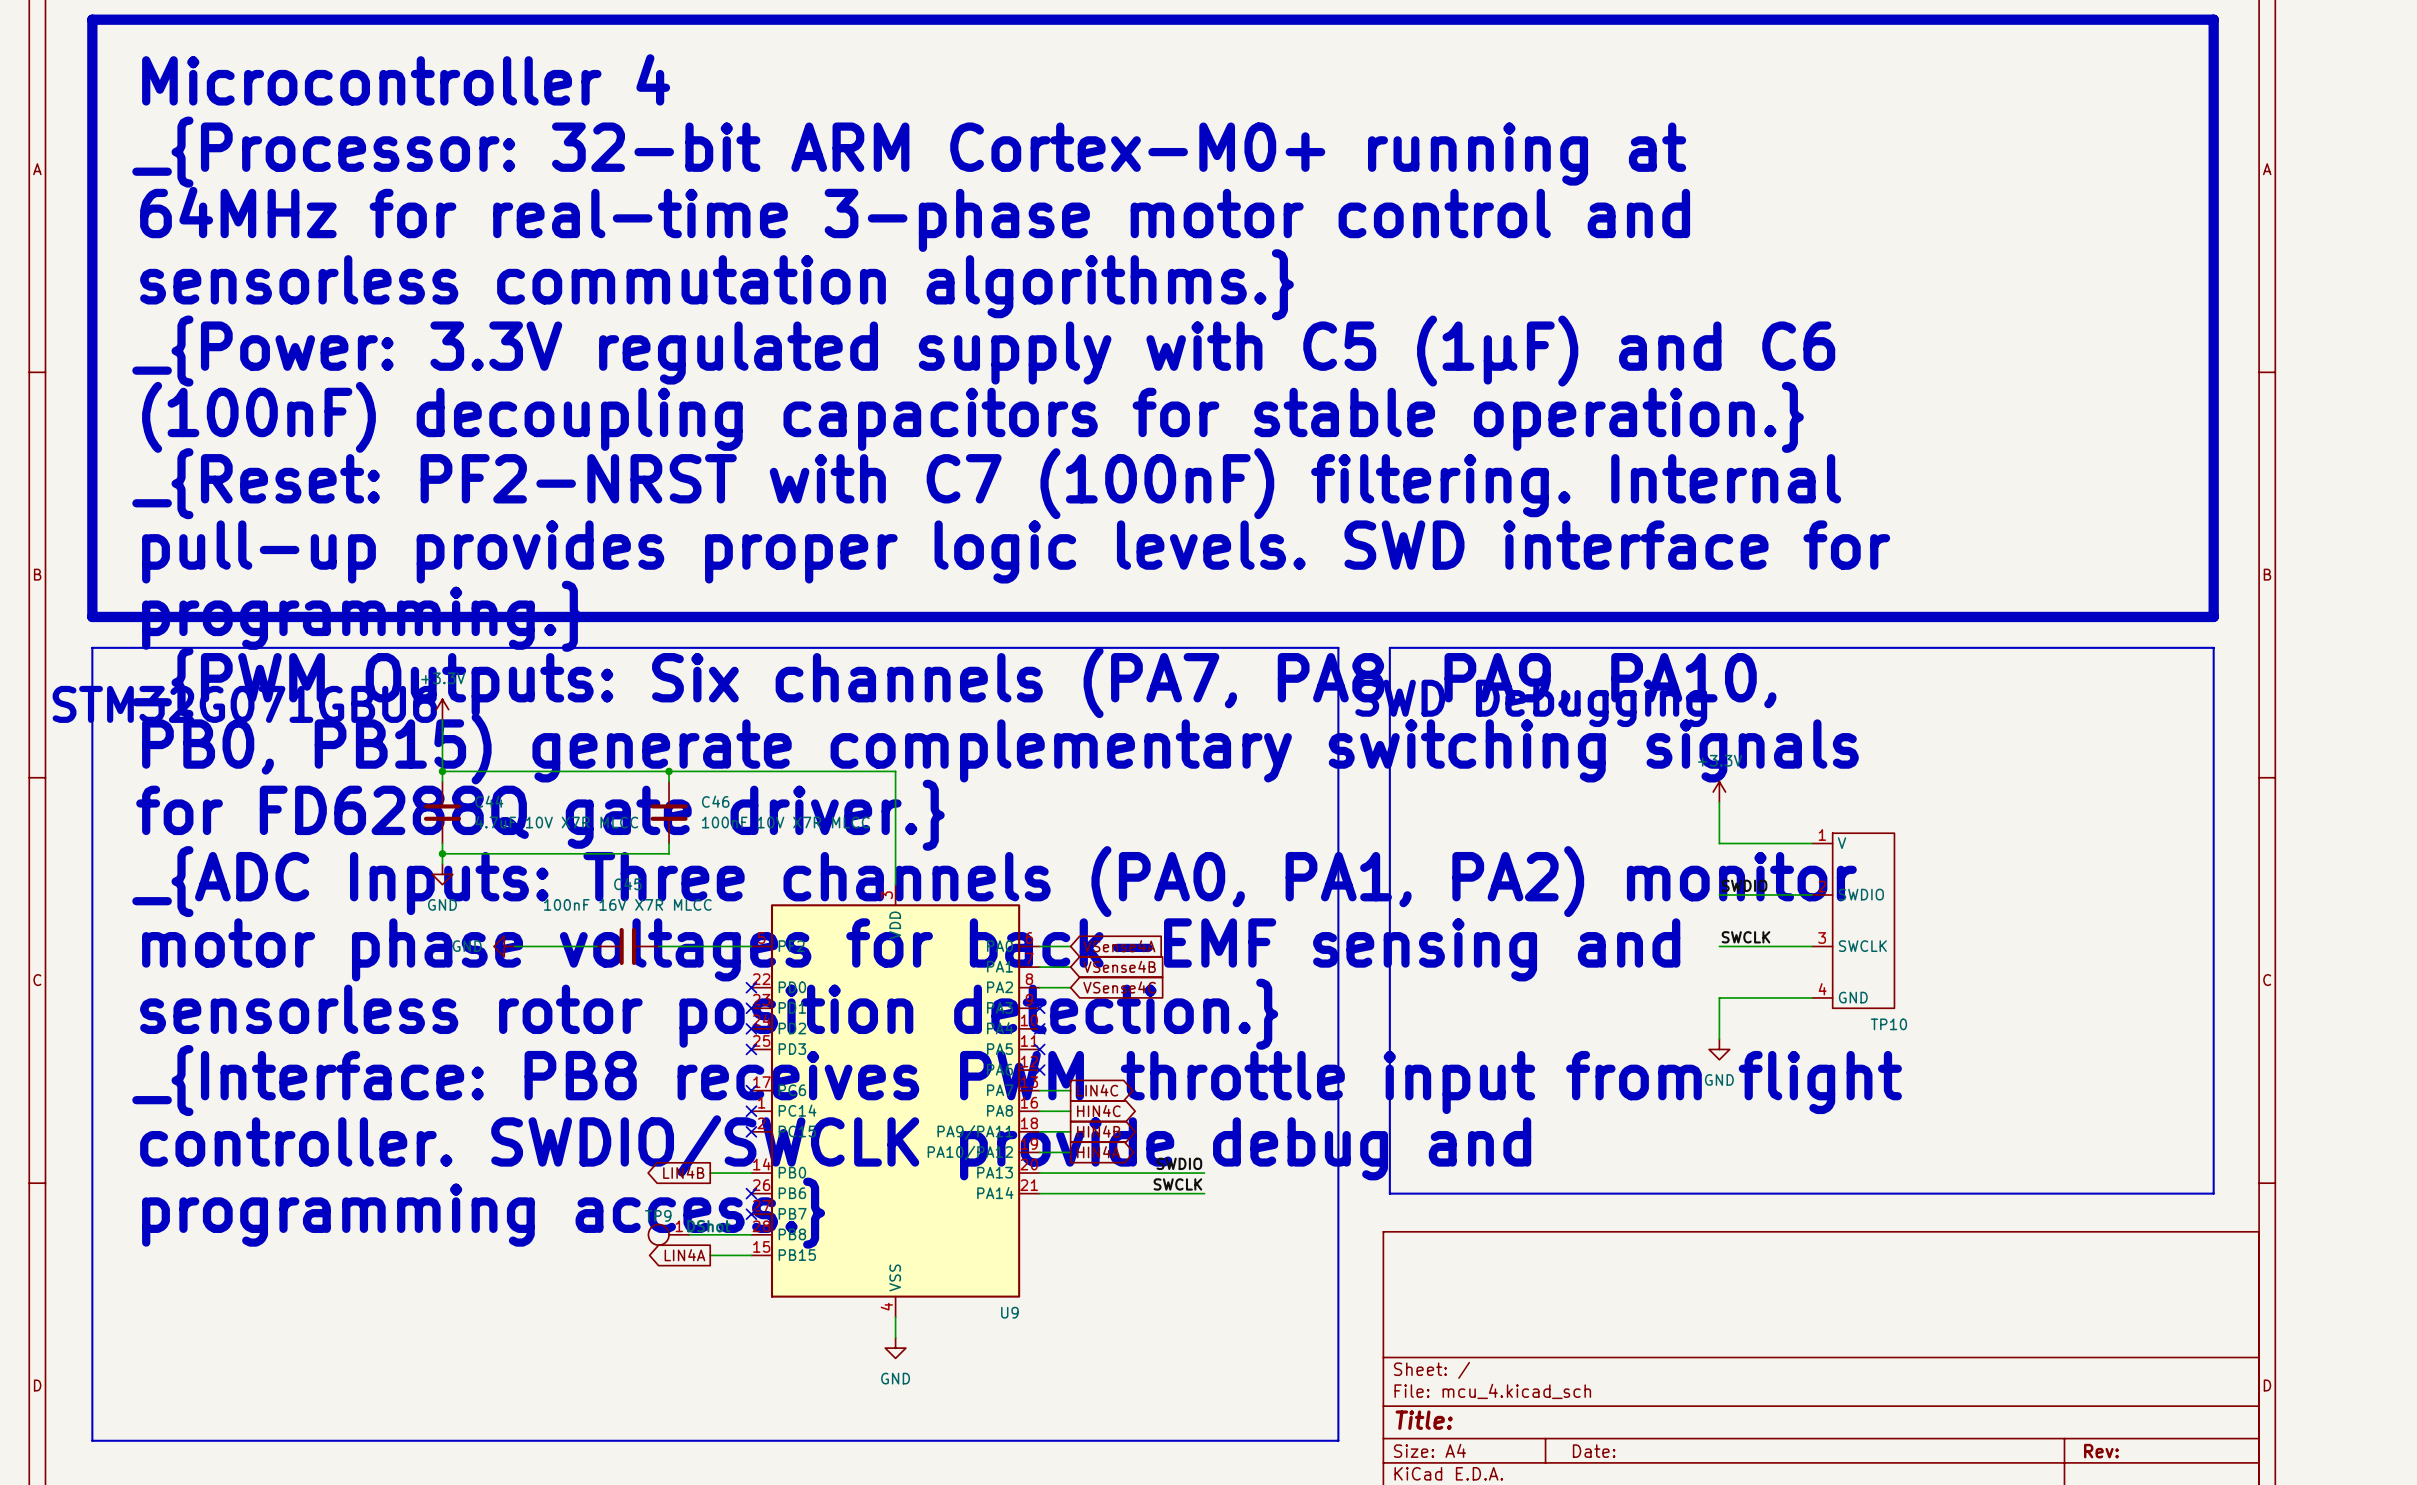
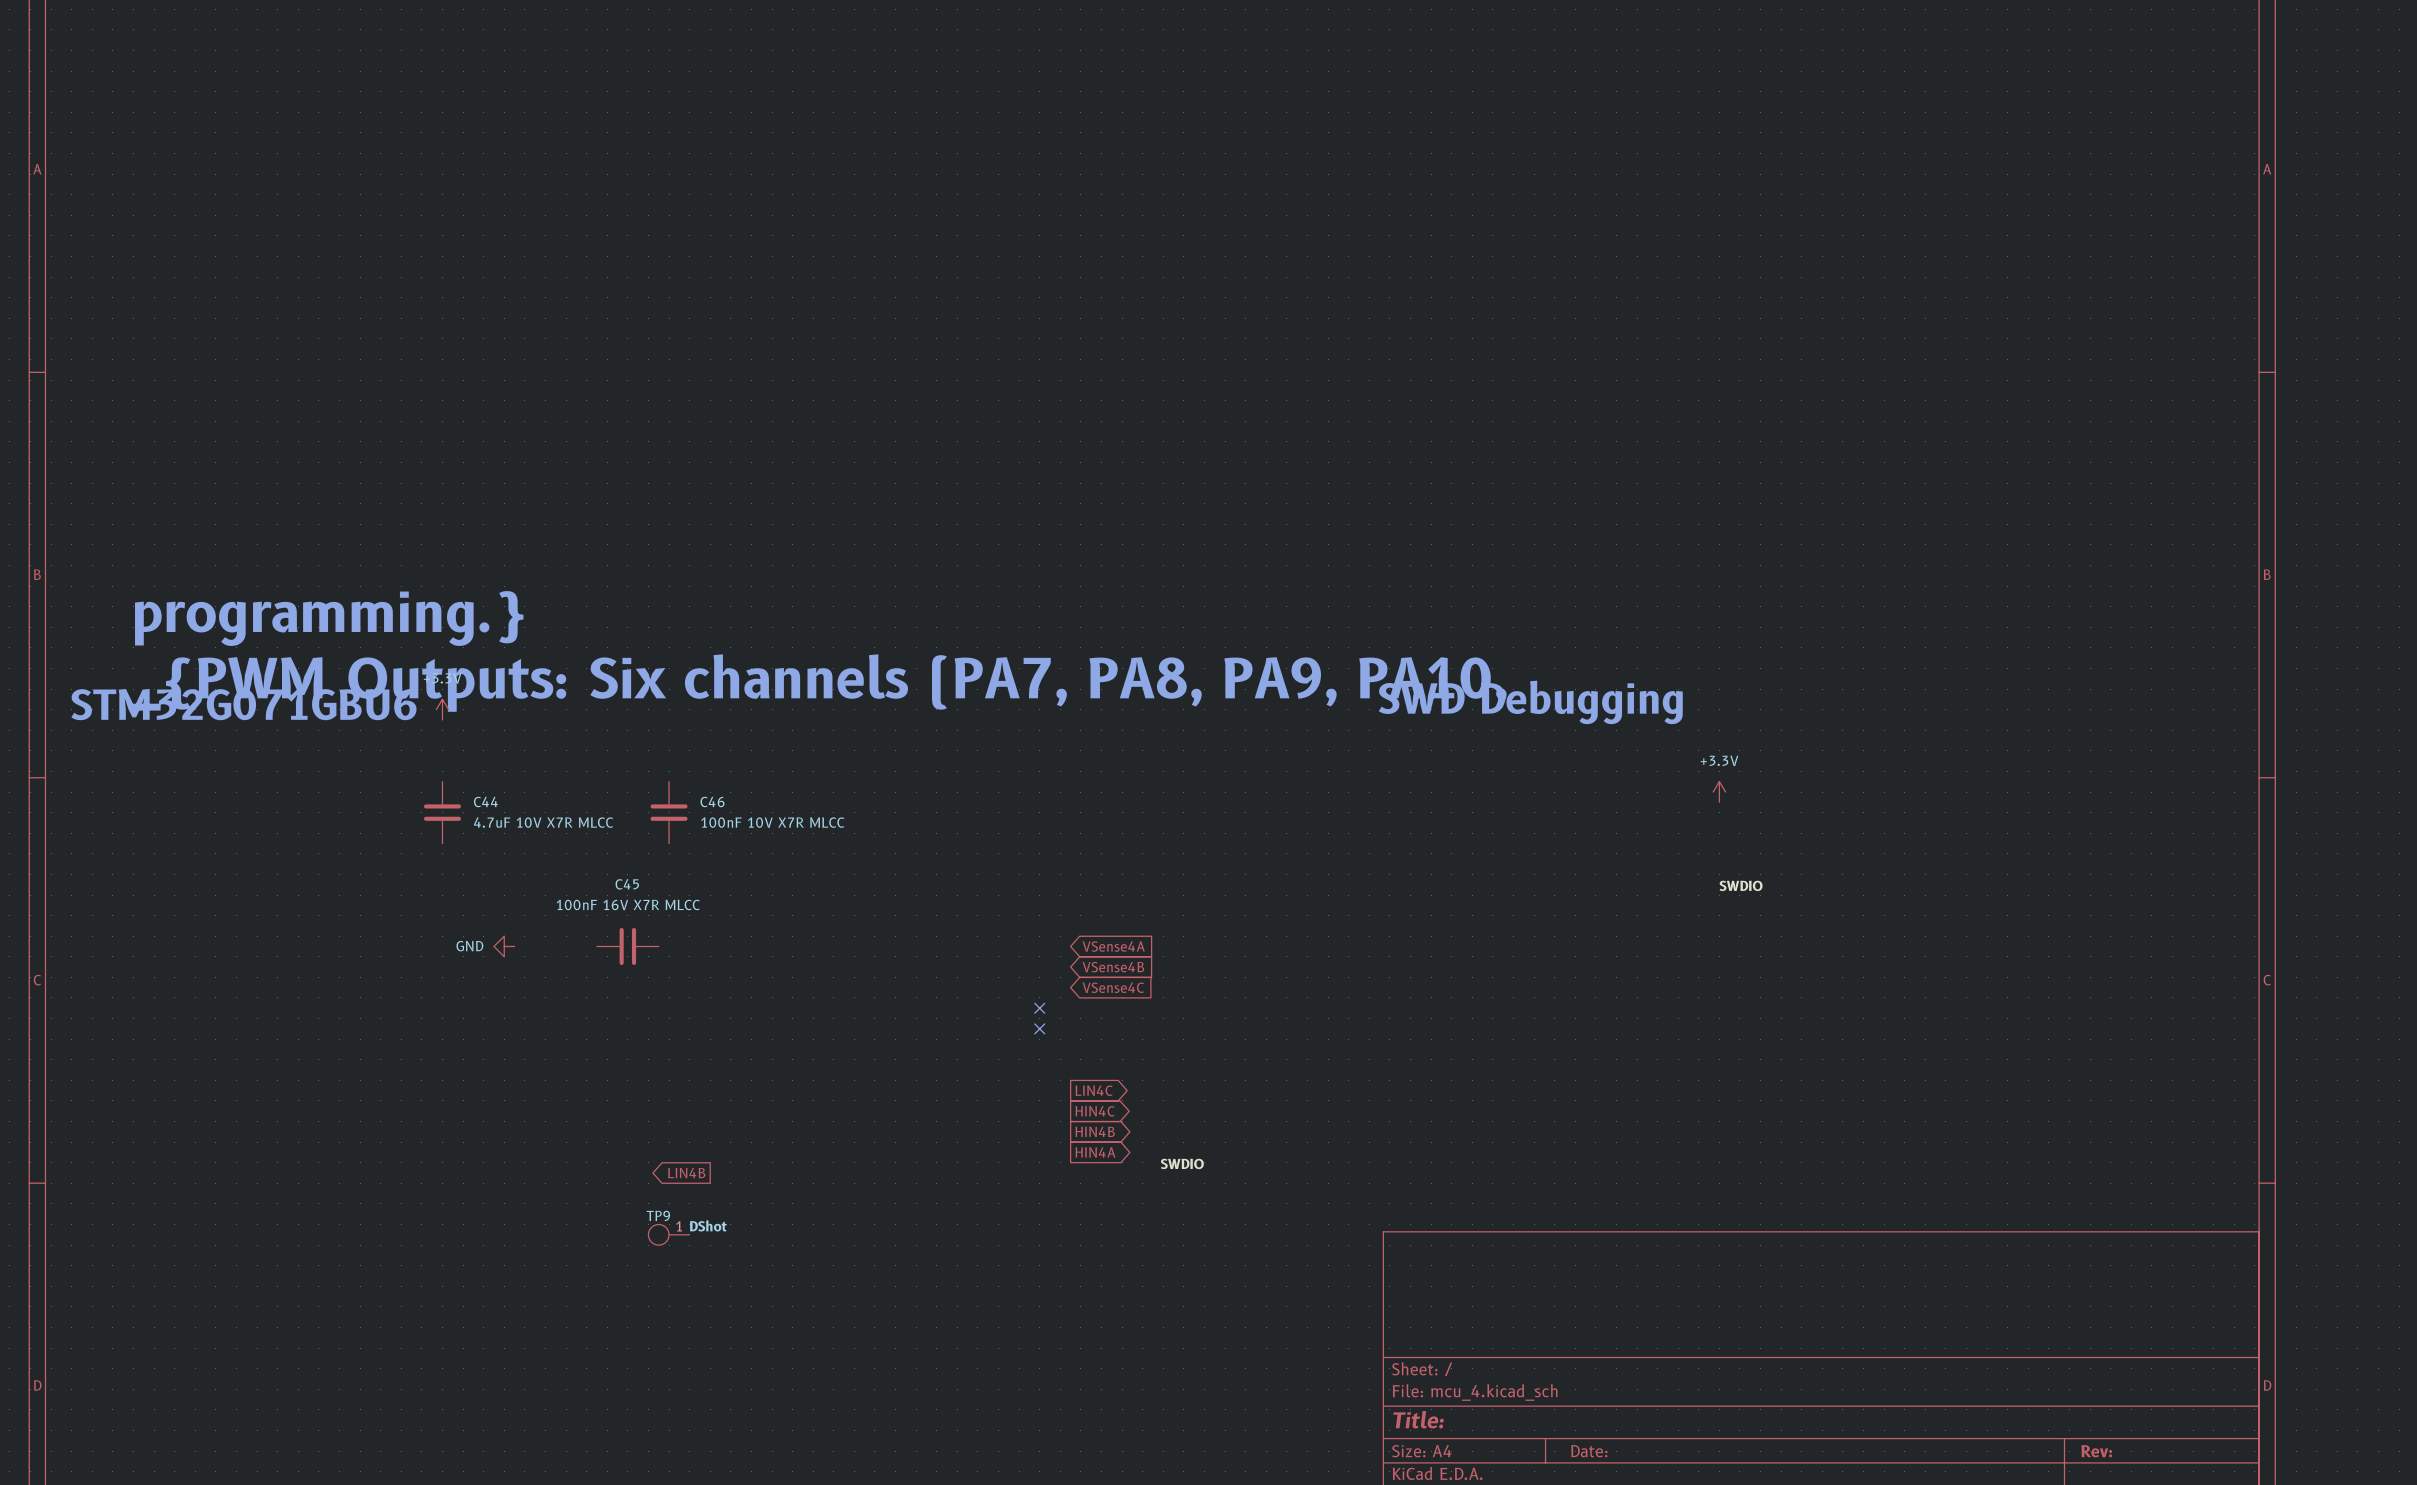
line: (92, 19) (2213, 19) (2213, 616) (92, 616) (92, 19) -> none
text: Microcontroller 4 (406, 79) -> none
text: _{Processor: 32-bit ARM Cortex-M0+ running at (909, 152) -> none
text: 64MHz for real-time 3-phase motor control and (915, 219) -> none
text: sensorless commutation algorithms.} (716, 284) -> none
text: _{Power: 3.3V regulated supply with C5 (1µF) and C6 (983, 351) -> none
text: (100nF) decoupling capacitors for stable operation.} (972, 417) -> none
text: _{Reset: PF2-NRST with C7 (100nF) filtering. Internal (986, 483) -> none
text: pull-up provides proper logic levels. SWD interface for (1016, 551) -> none
line: (92, 647) (1338, 647) (1338, 1440) (92, 1440) (92, 647) -> none
line: (1389, 647) (2213, 647) (2213, 1193) (1389, 1193) (1389, 647) -> none
wire: (442, 719) (442, 781) -> none
text: PB0, PB15) generate complementary switching signals (1000, 748) -> none
wire: (442, 771) (895, 771) (895, 884) -> none
junction: (442, 771) -> none
wire: (669, 771) (669, 781) -> none
junction: (669, 771) -> none
wire: (1719, 802) (1719, 843) (1812, 843) -> none
text: for FD6288Q gate driver.} (540, 815) -> none
wire: (442, 843) (442, 864) -> none
wire: (669, 843) (669, 853) (442, 853) -> none
junction: (442, 853) -> none
power symbol: GND (442, 874) -> none
text: _{ADC Inputs: Three channels (PA0, PA1, PA2) monitor (994, 881) -> none
wire: (1719, 895) (1812, 895) -> none
TP10: (1853, 920) -> none
label: SWCLK (1746, 937) -> none
wire: (514, 946) (596, 946) -> none
wire: (658, 946) (751, 946) -> none
wire: (1039, 946) (1070, 946) -> none
wire: (1719, 946) (1812, 946) -> none
text: motor phase voltages for back-EMF sensing and (911, 949) -> none
wire: (1039, 967) (1070, 967) -> none
no-connect mark: (751, 987) -> none
wire: (1039, 987) (1070, 987) -> none
wire: (1812, 997) (1719, 997) (1719, 1039) -> none
no-connect mark: (751, 1008) -> none
text: sensorless rotor position detection.} (709, 1014) -> none
no-connect mark: (751, 1028) -> none
no-connect mark: (751, 1049) -> none
no-connect mark: (1039, 1049) -> none
power symbol: GND (1719, 1049) -> none
no-connect mark: (1039, 1070) -> none
text: _{Interface: PB8 receives PWM throttle input from flight (1017, 1080) -> none
no-connect mark: (751, 1090) -> none
wire: (1039, 1090) (1070, 1090) -> none
U9: (895, 1100) -> none
no-connect mark: (751, 1111) -> none
wire: (1039, 1111) (1070, 1111) -> none
no-connect mark: (751, 1131) -> none
wire: (1039, 1131) (1070, 1131) -> none
text: controller. SWDIO/SWCLK provide debug and (835, 1147) -> none
wire: (1039, 1152) (1070, 1152) -> none
wire: (710, 1173) (751, 1173) -> none
wire: (1039, 1173) (1204, 1173) -> none
label: SWCLK (1177, 1184) -> none
no-connect mark: (751, 1193) -> none
wire: (1039, 1193) (1204, 1193) -> none
text: programming access.} (483, 1213) -> none
no-connect mark: (751, 1214) -> none
wire: (689, 1234) (751, 1234) -> none
global label: LIN4A (684, 1255) -> none
wire: (710, 1255) (751, 1255) -> none
wire: (895, 1317) (895, 1337) -> none
power symbol: GND (895, 1348) -> none

